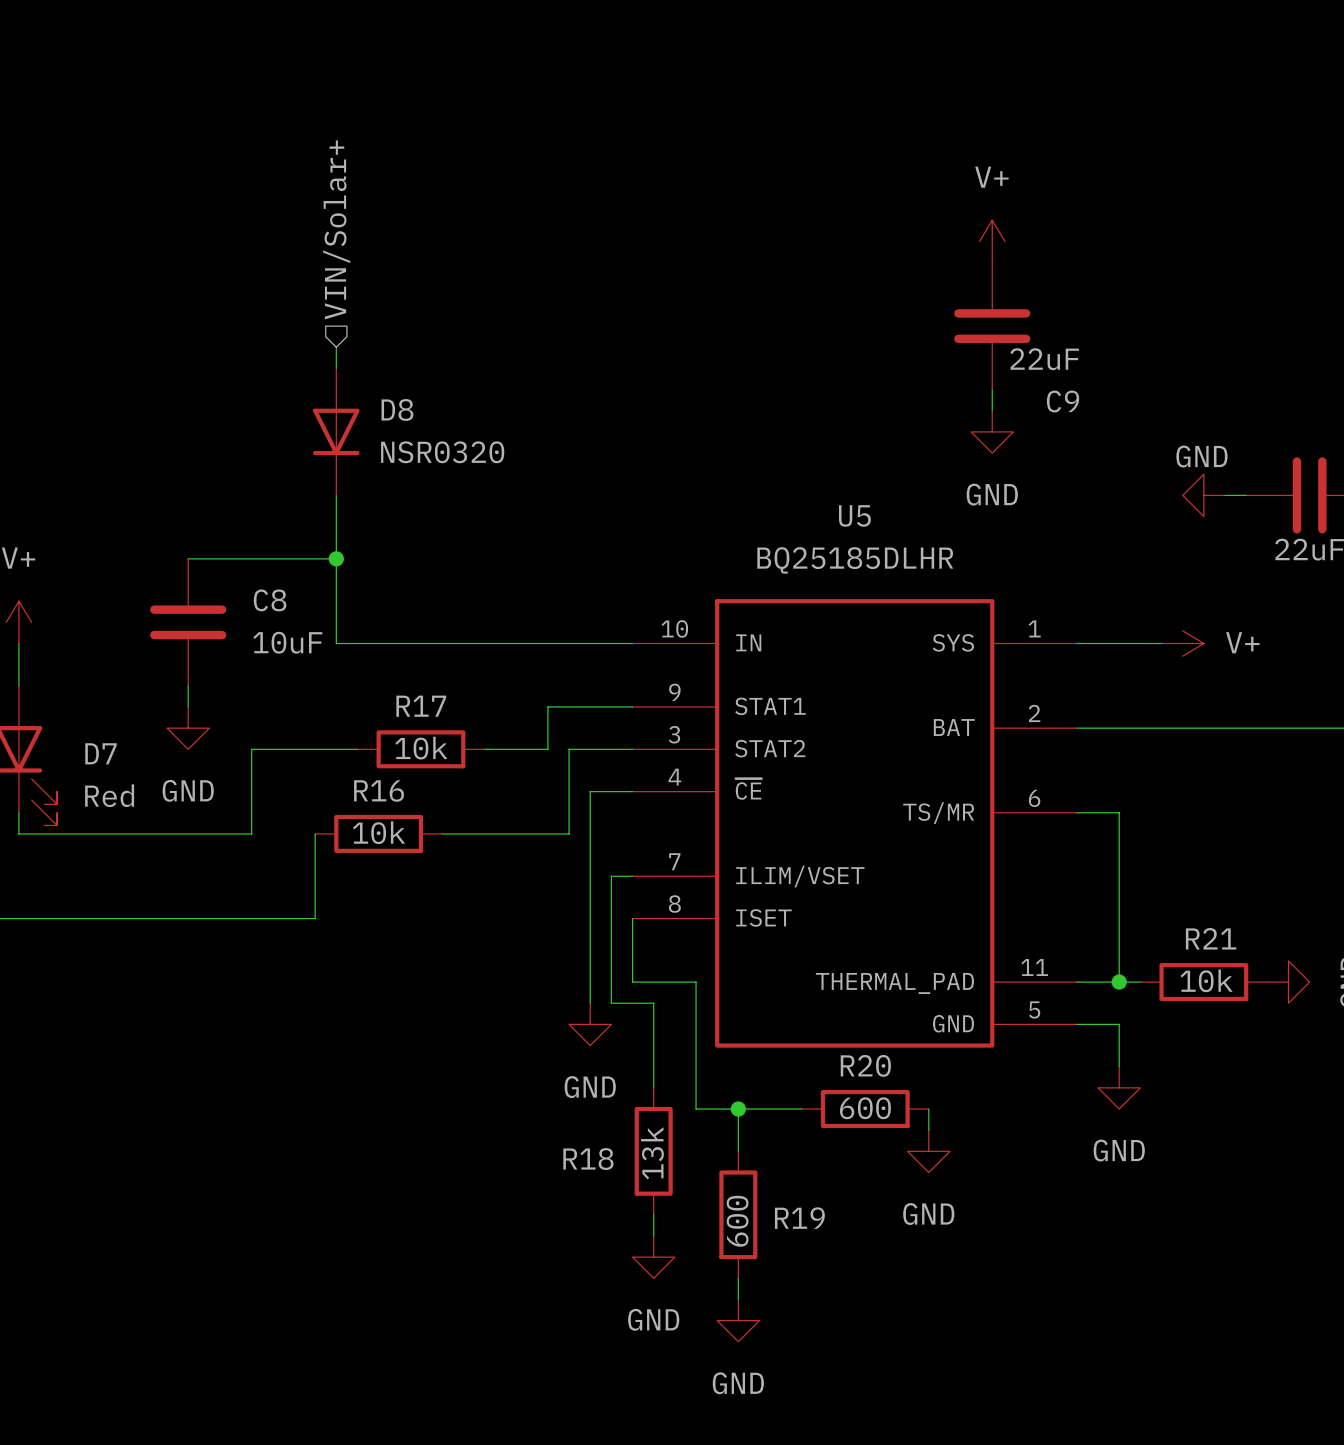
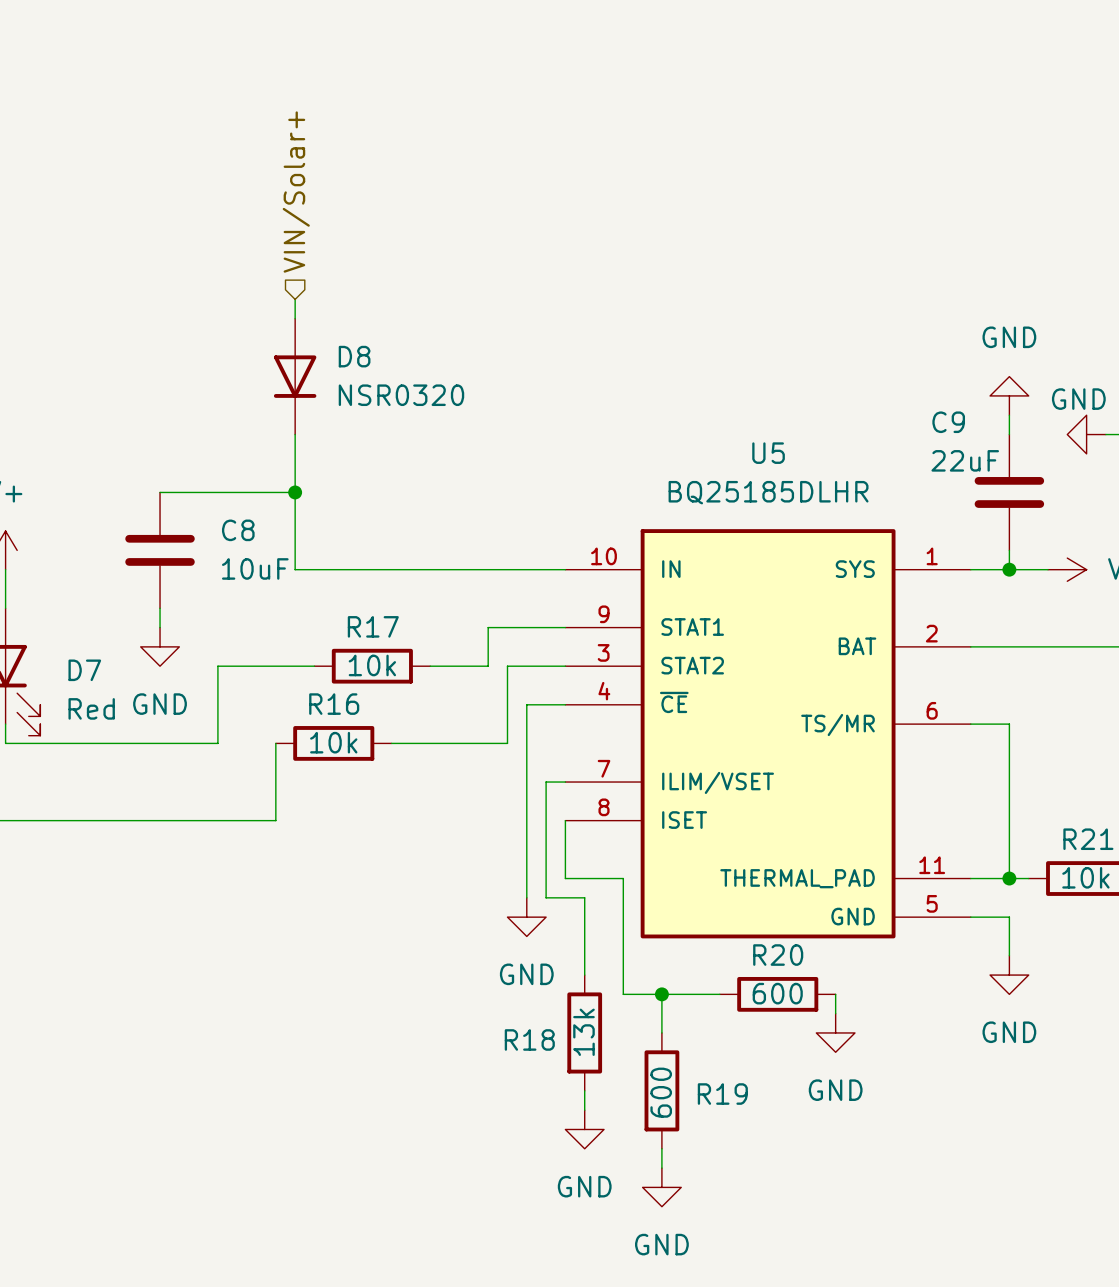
power symbol: V+ (992, 241) -> none
C9 position: (992, 326) -> (1009, 492)
C9 value position: 22uF (1044, 359) -> 22uF (965, 460)
wire: (992, 389) (992, 410) -> (1009, 415) (1009, 434)
C9 name position: C9 (1063, 401) -> C9 (948, 422)
power symbol rotation: 0° (992, 431) -> 180° (1009, 395)
power symbol position: GND (992, 431) -> GND (1009, 395)
wire: none -> (1009, 550) (1009, 569)
junction: none -> (1009, 569)

